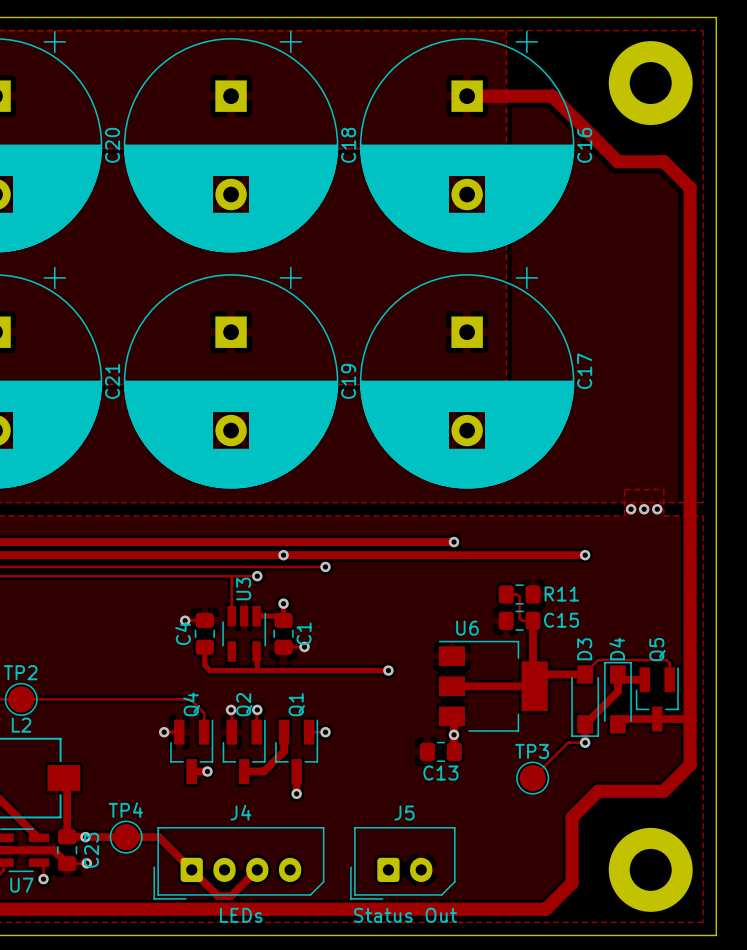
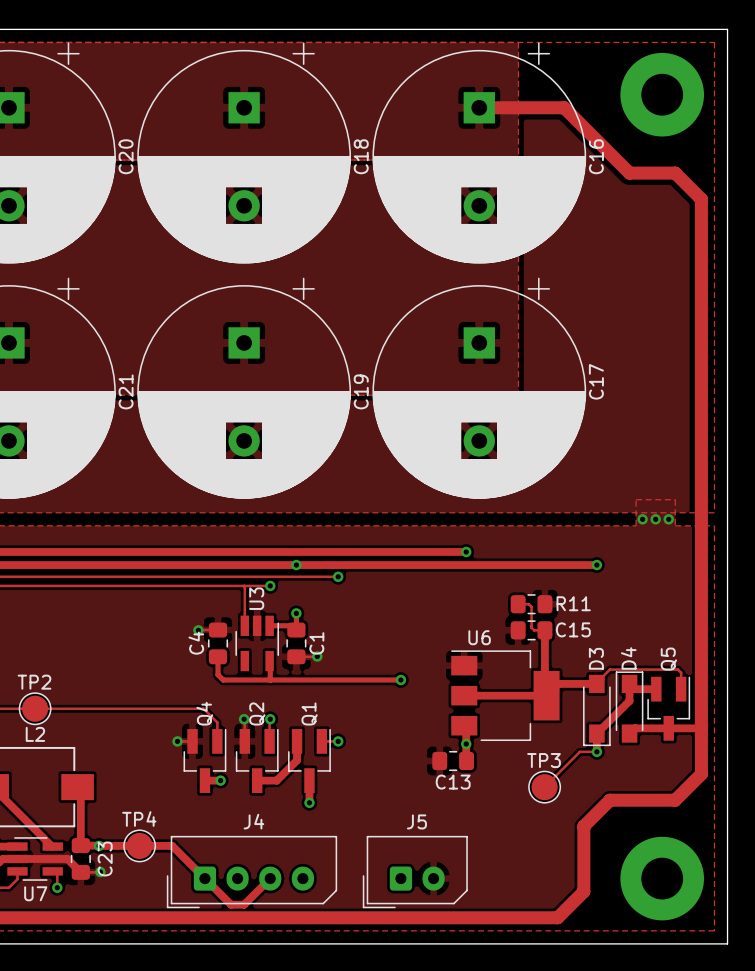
text: LEDs (241, 915) -> none
text: Status Out (405, 915) -> none

